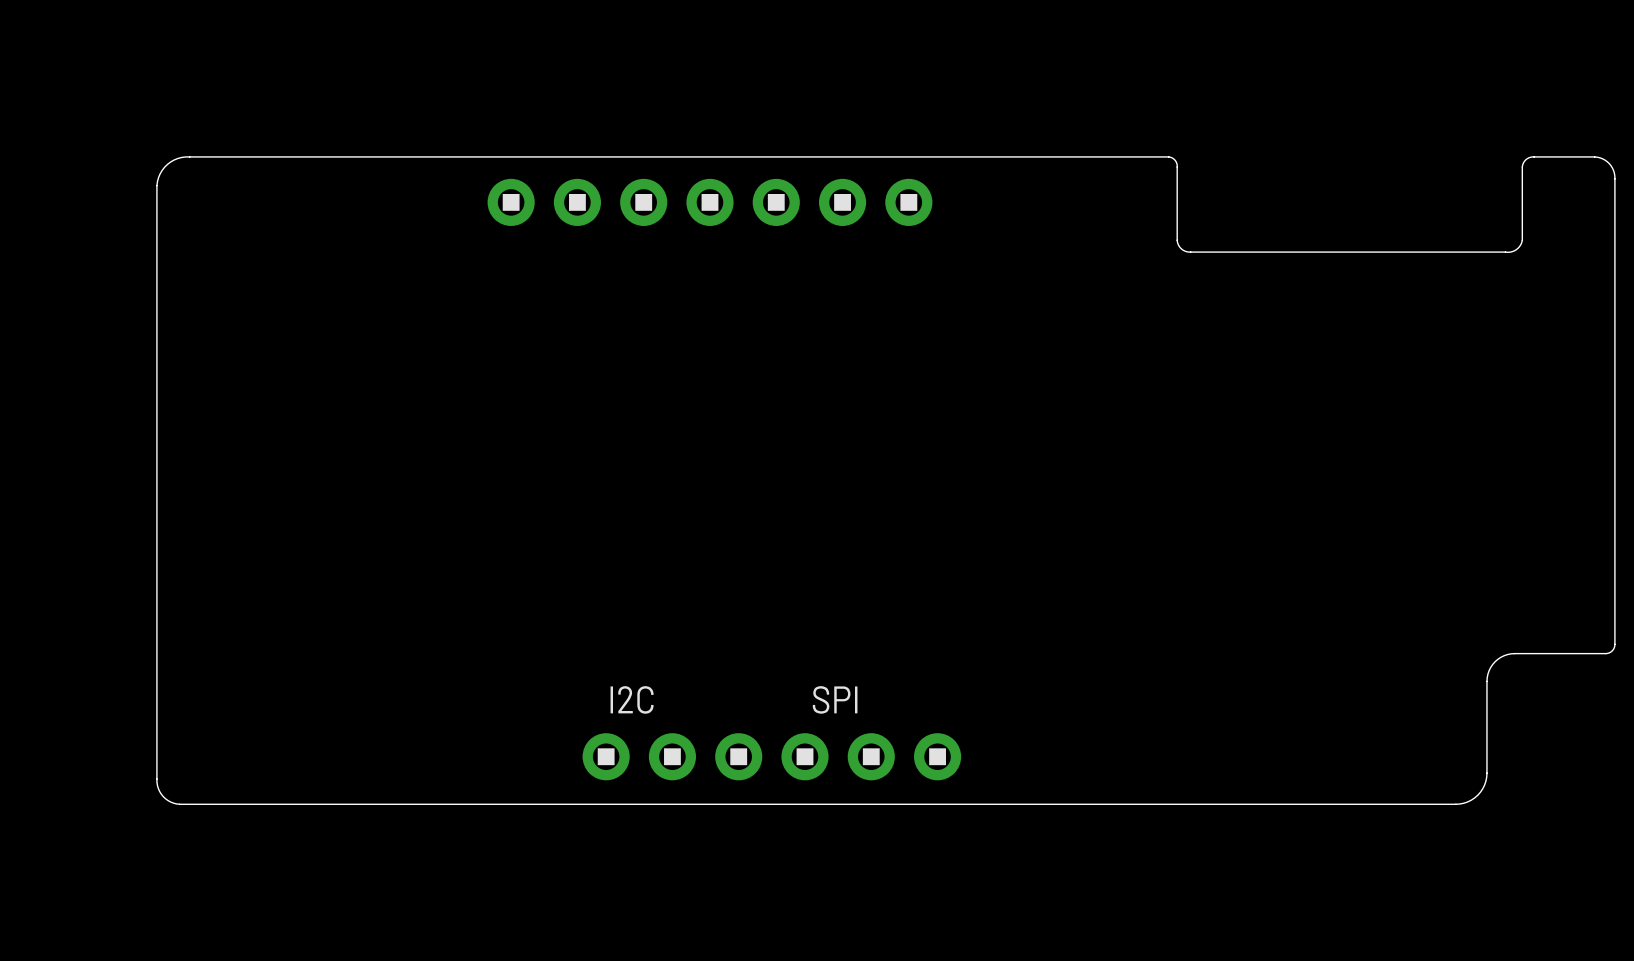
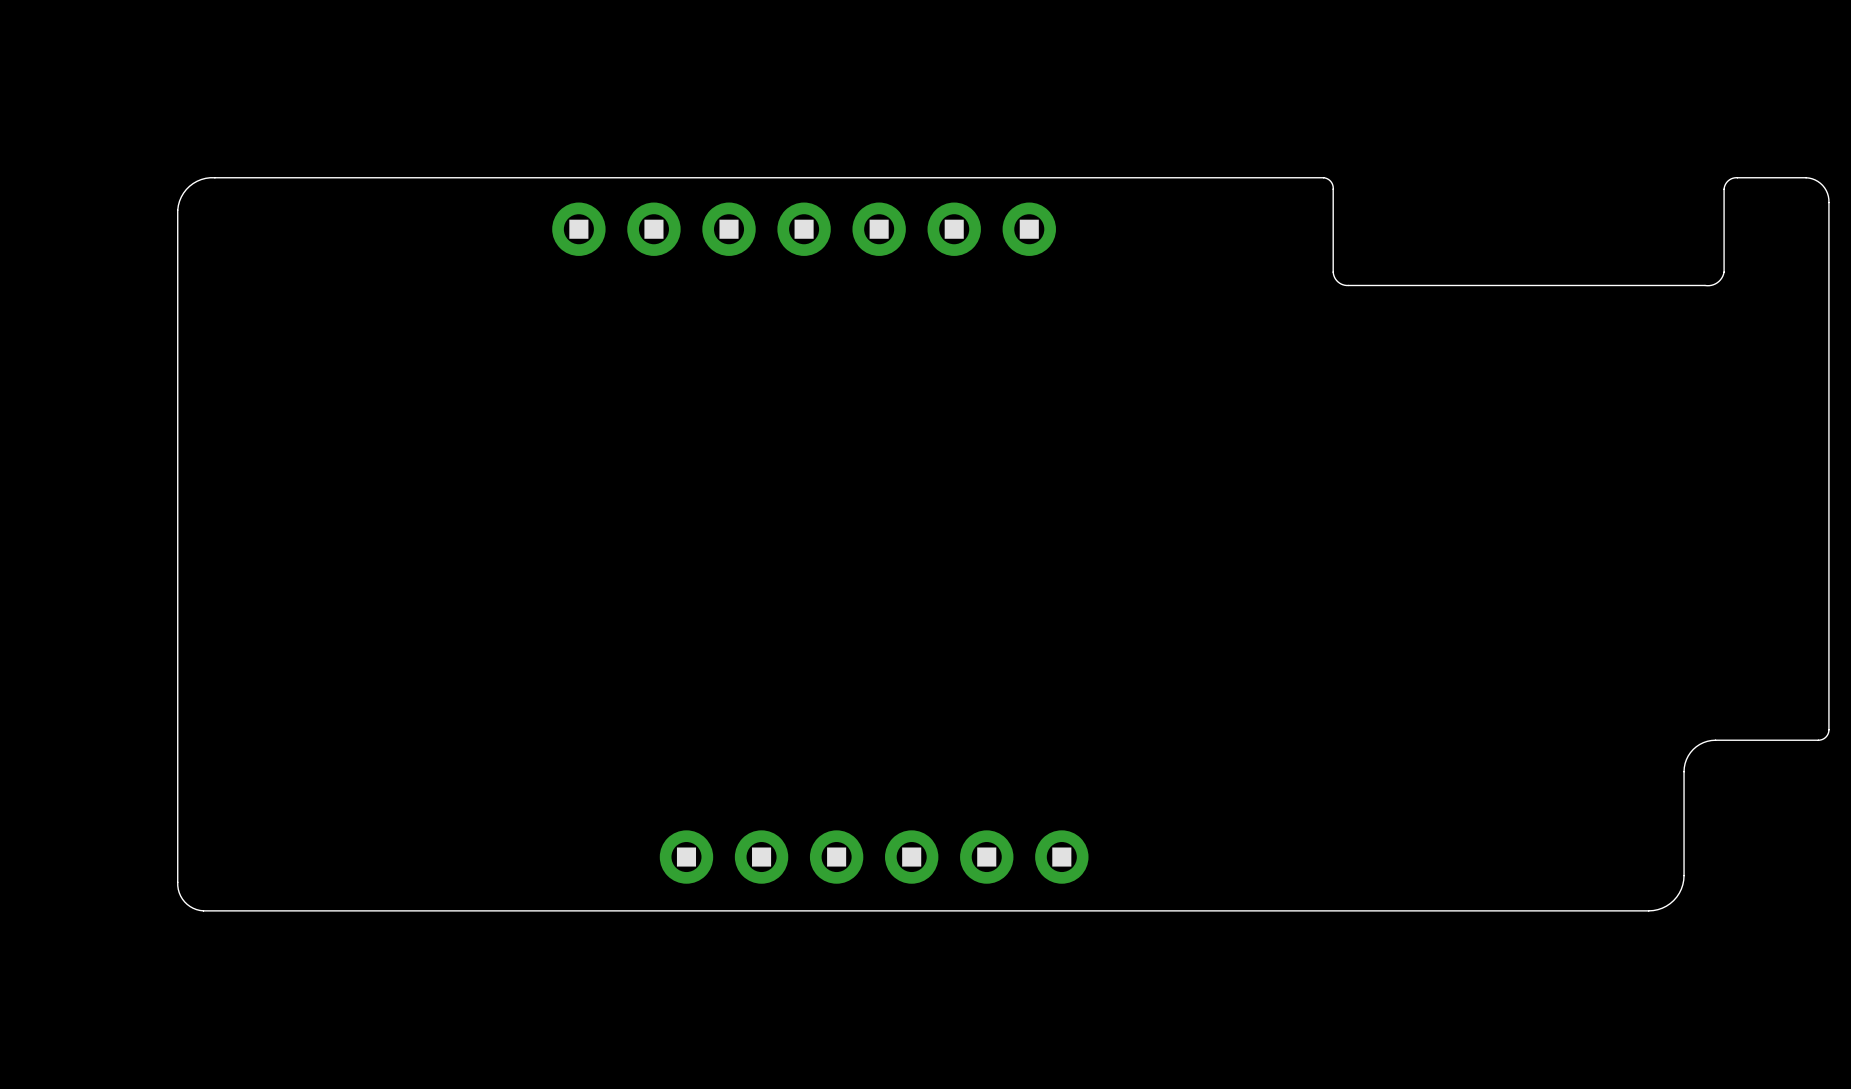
text: I2C (632, 699) -> none
text: SPI (835, 699) -> none

